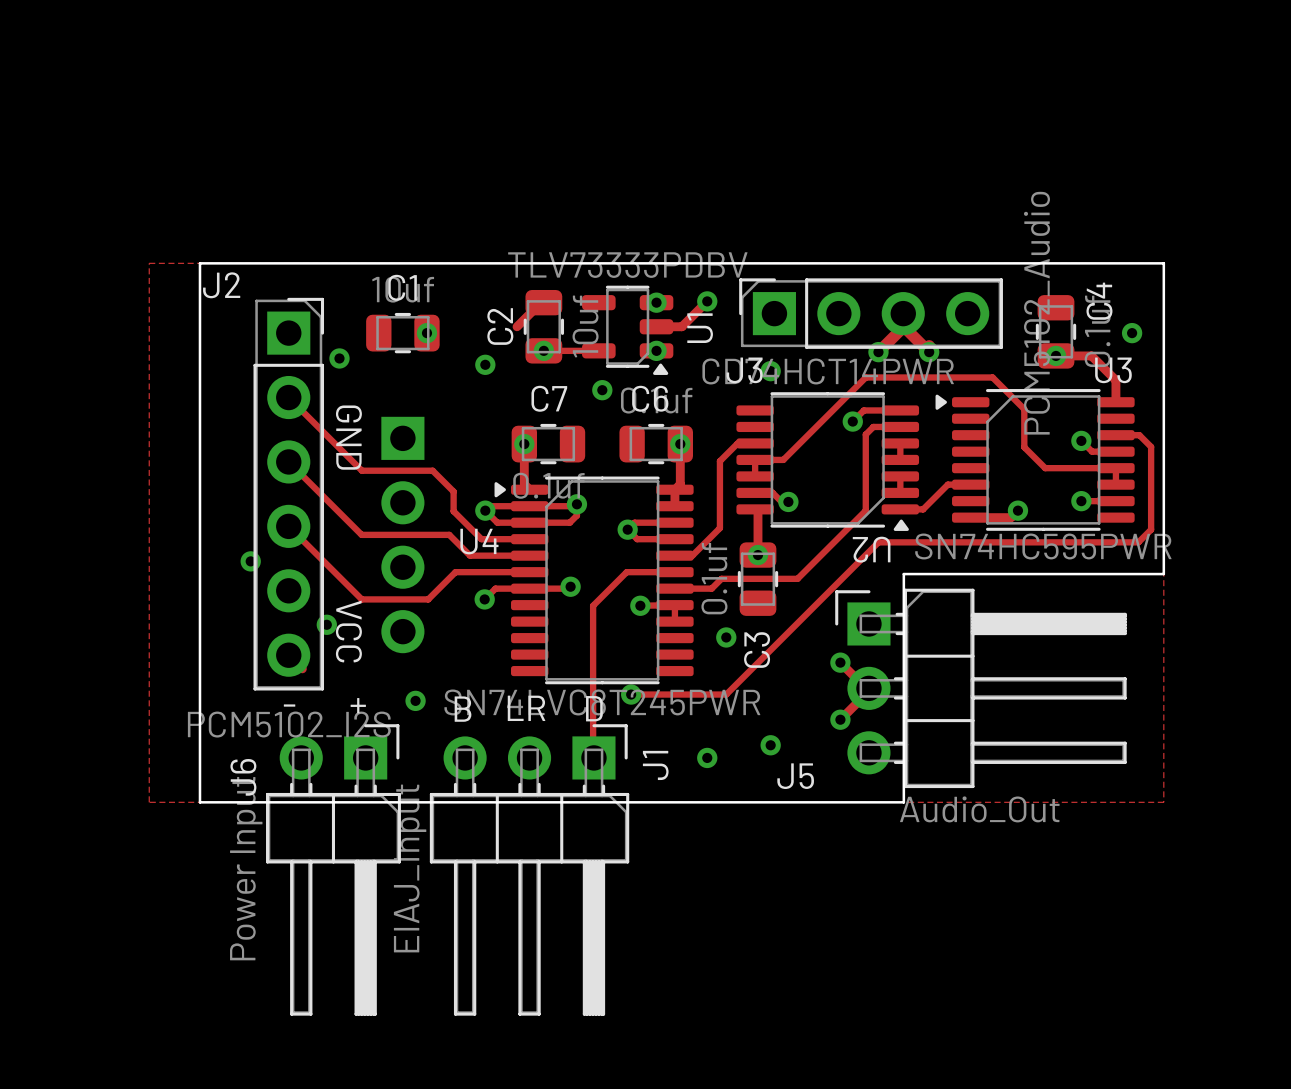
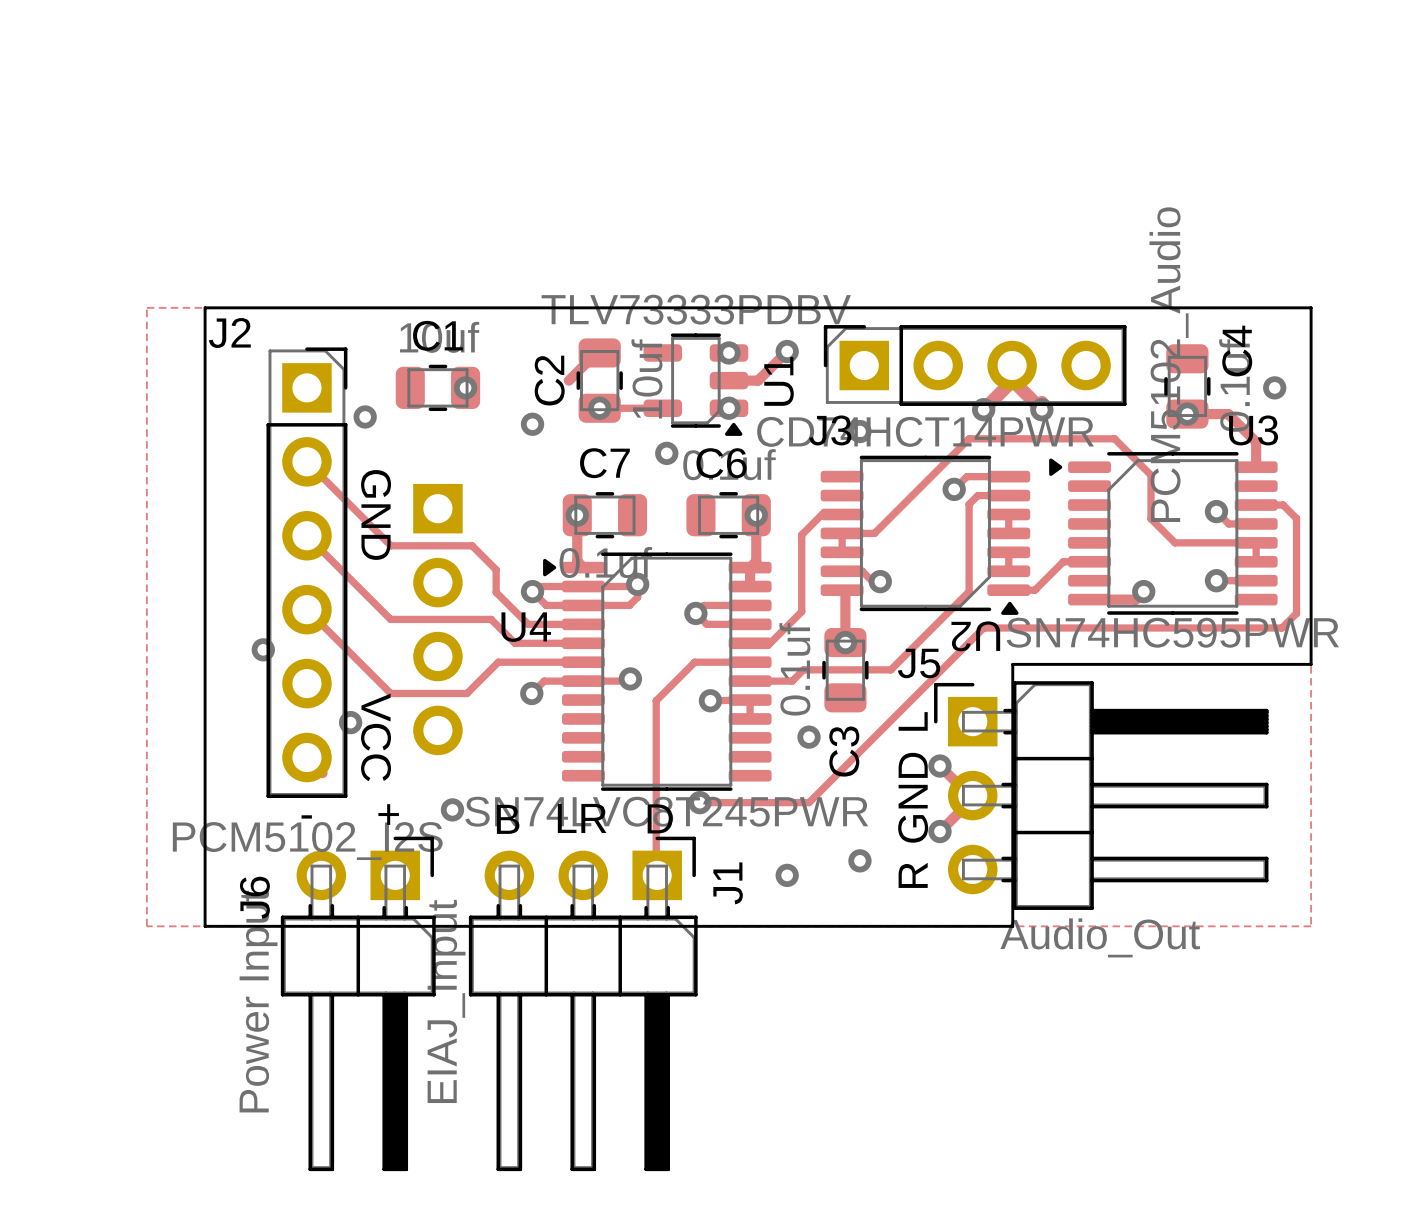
text: none -> L (913, 721)
text: none -> GND (913, 797)
text: none -> R (913, 875)
J5 name position: J5 (795, 776) -> J5 (919, 663)

